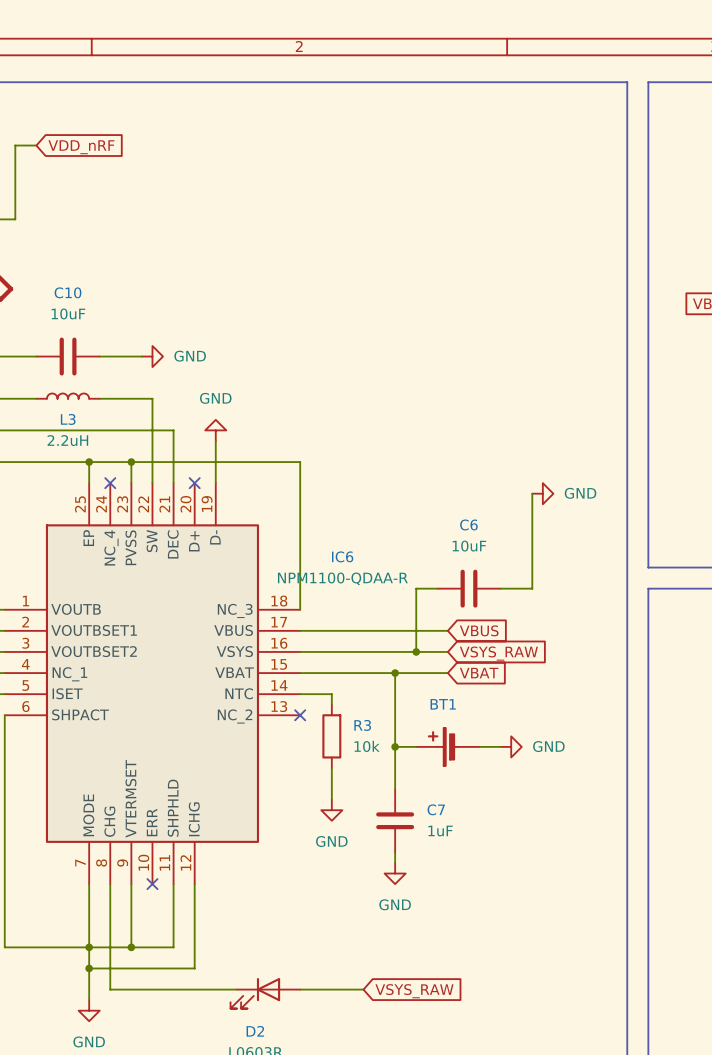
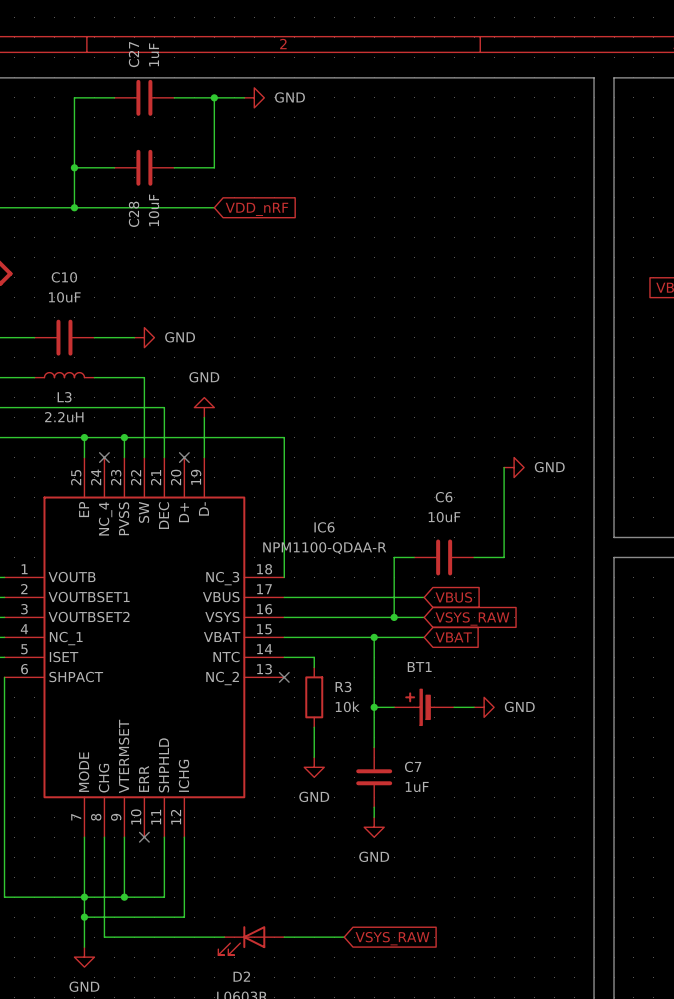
wire: none -> (114, 97) (74, 97) (74, 207)
C27: none -> 1uF (144, 97)
wire: none -> (174, 97) (244, 97)
wire: none -> (214, 97) (214, 167) (174, 167)
junction: none -> (214, 97)
power symbol: none -> GND (254, 97)
wire: (36, 145) (15, 145) (15, 219) -> (214, 207) (14, 207)
global label position: VDD_nRF (81, 147) -> VDD_nRF (256, 209)
wire: none -> (74, 167) (114, 167)
junction: none -> (74, 167)
C28: none -> 10uF (144, 167)
junction: none -> (74, 207)

